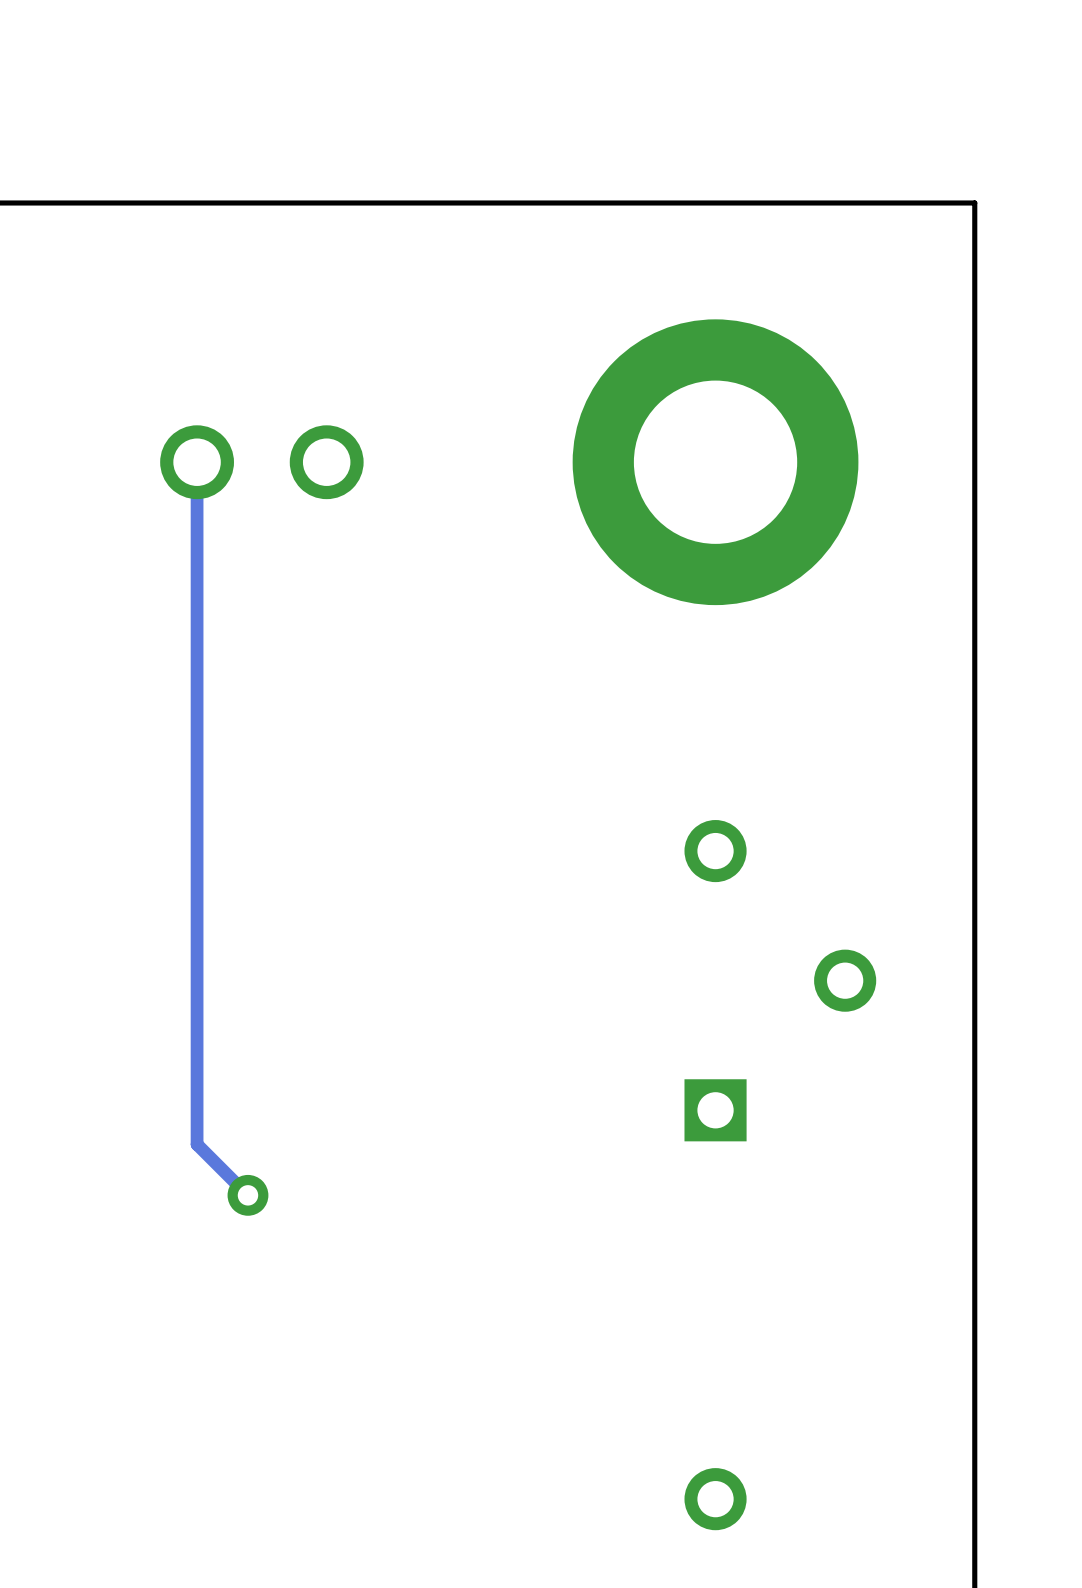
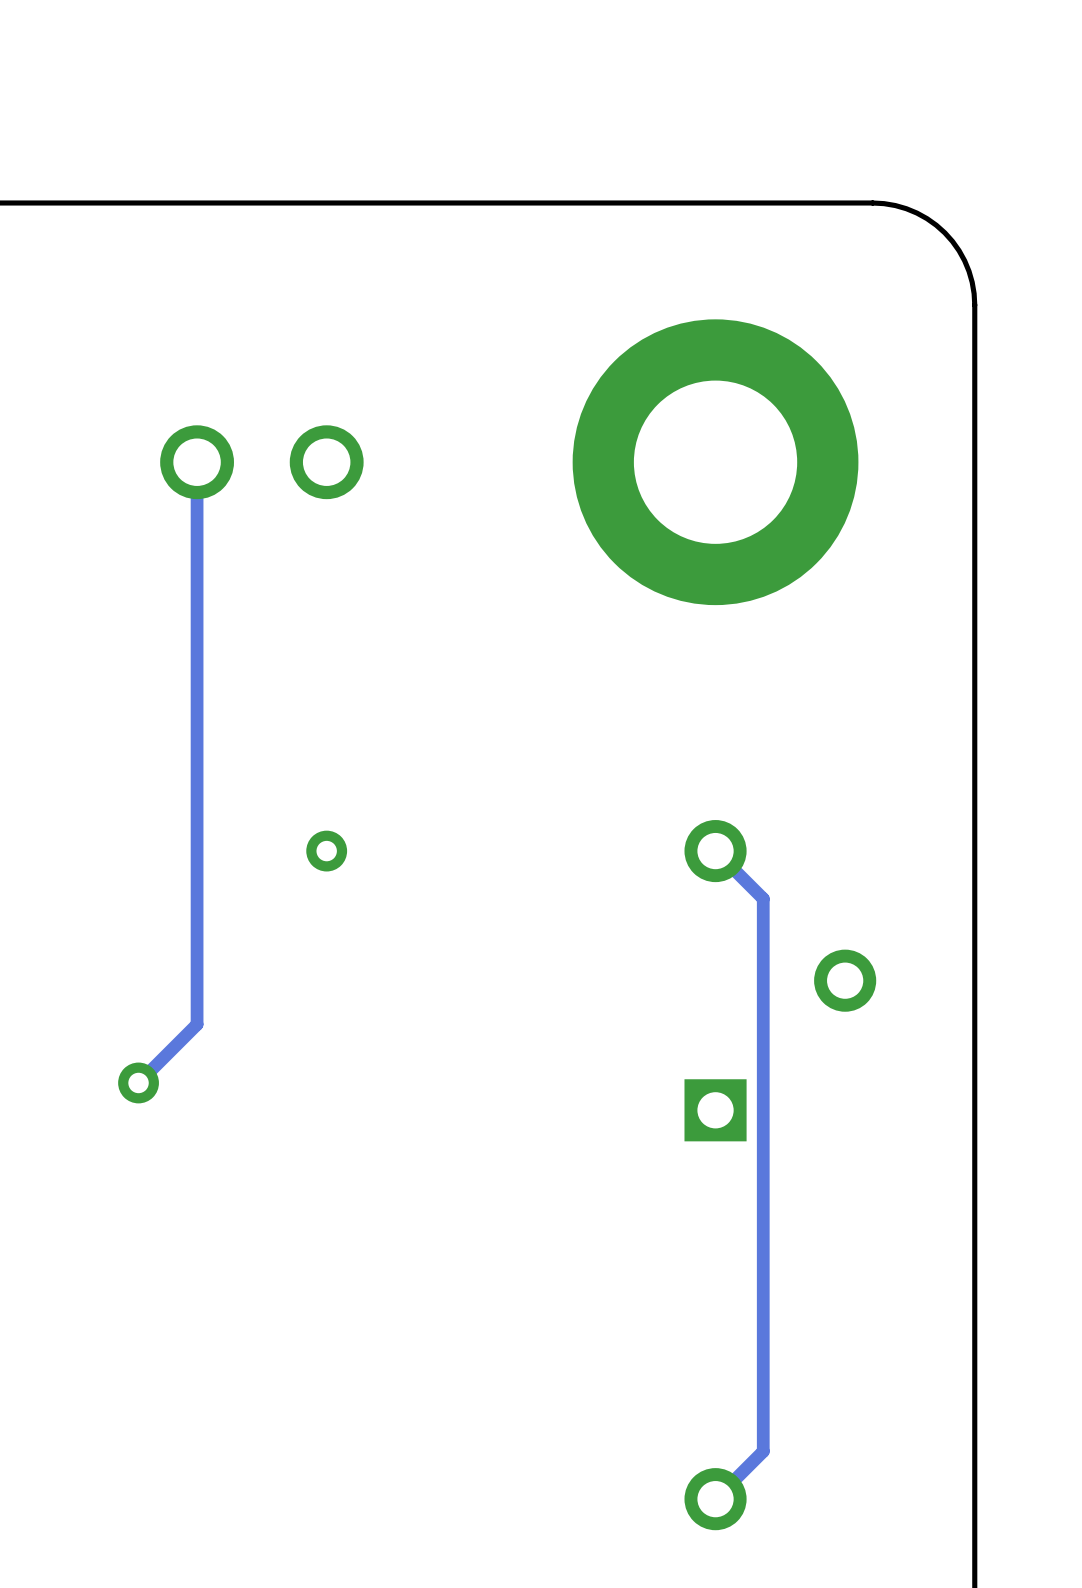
board edge: (872, 202) (974, 202) (974, 305) -> (872, 202) (906, 208) (927, 218) (944, 232) (959, 250) (969, 271) (974, 305)
via: none -> (326, 851)
track: none -> (715, 851) (763, 898) (763, 1451) (715, 1499)
track: (197, 1024) (197, 1144) (247, 1195) -> (197, 1024) (138, 1082)
via position: (247, 1195) -> (138, 1082)

